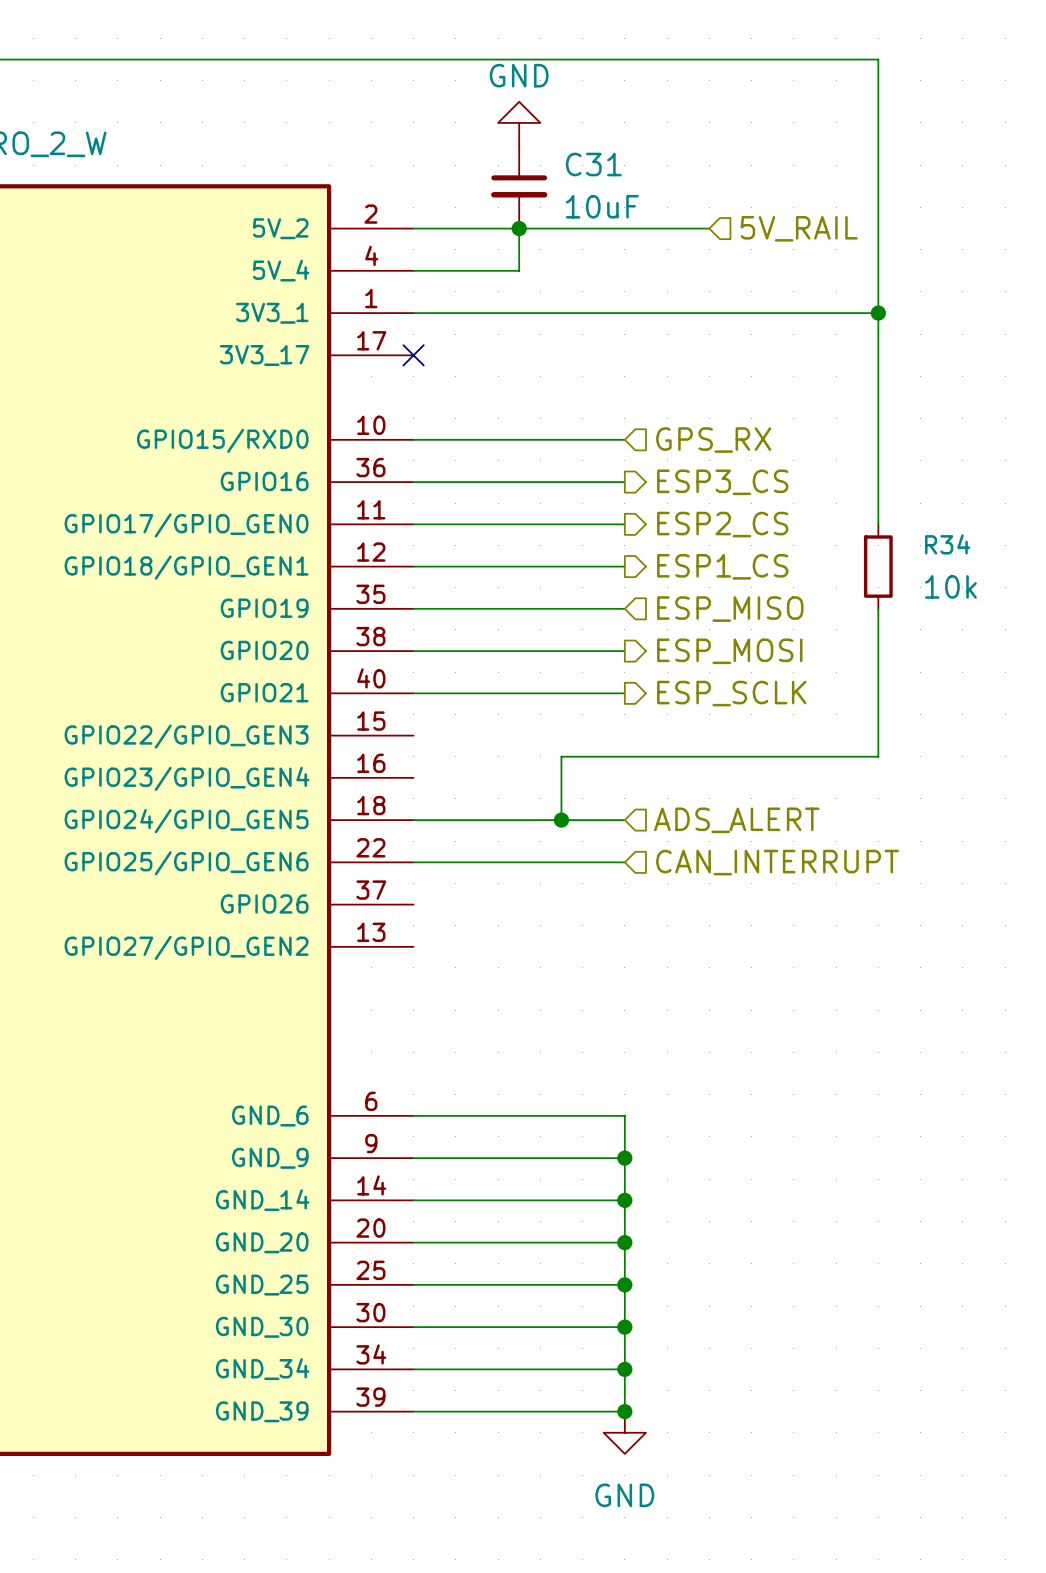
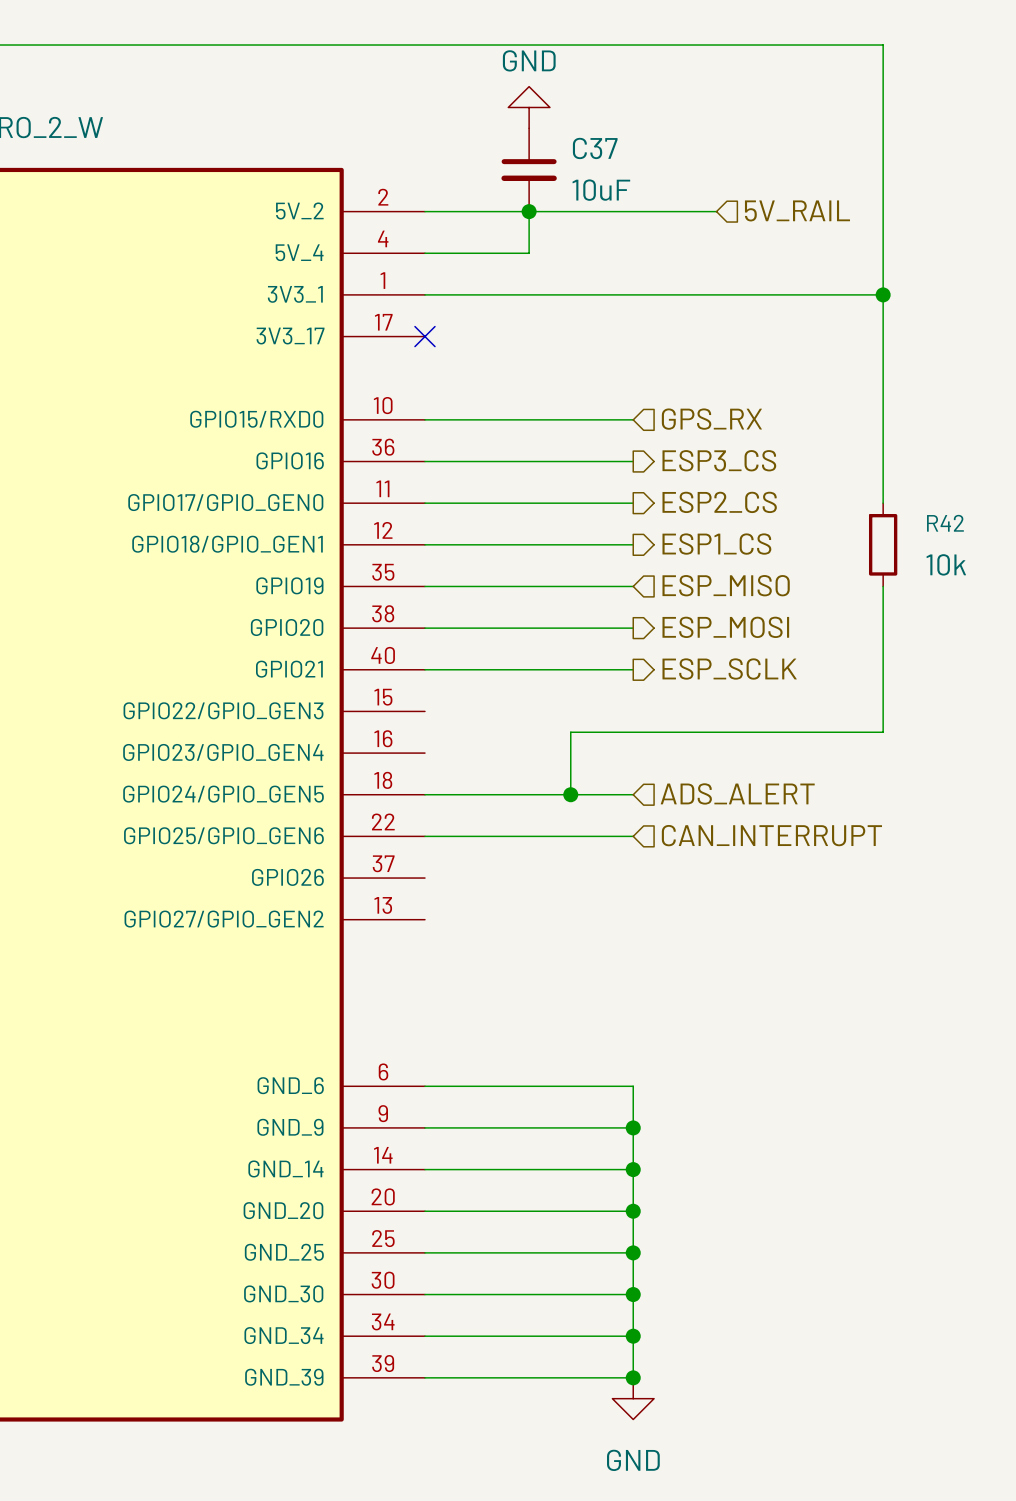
C31 name: C31 (593, 164) -> C37 (595, 148)
R34 name: R34 (947, 544) -> R42 (945, 523)

